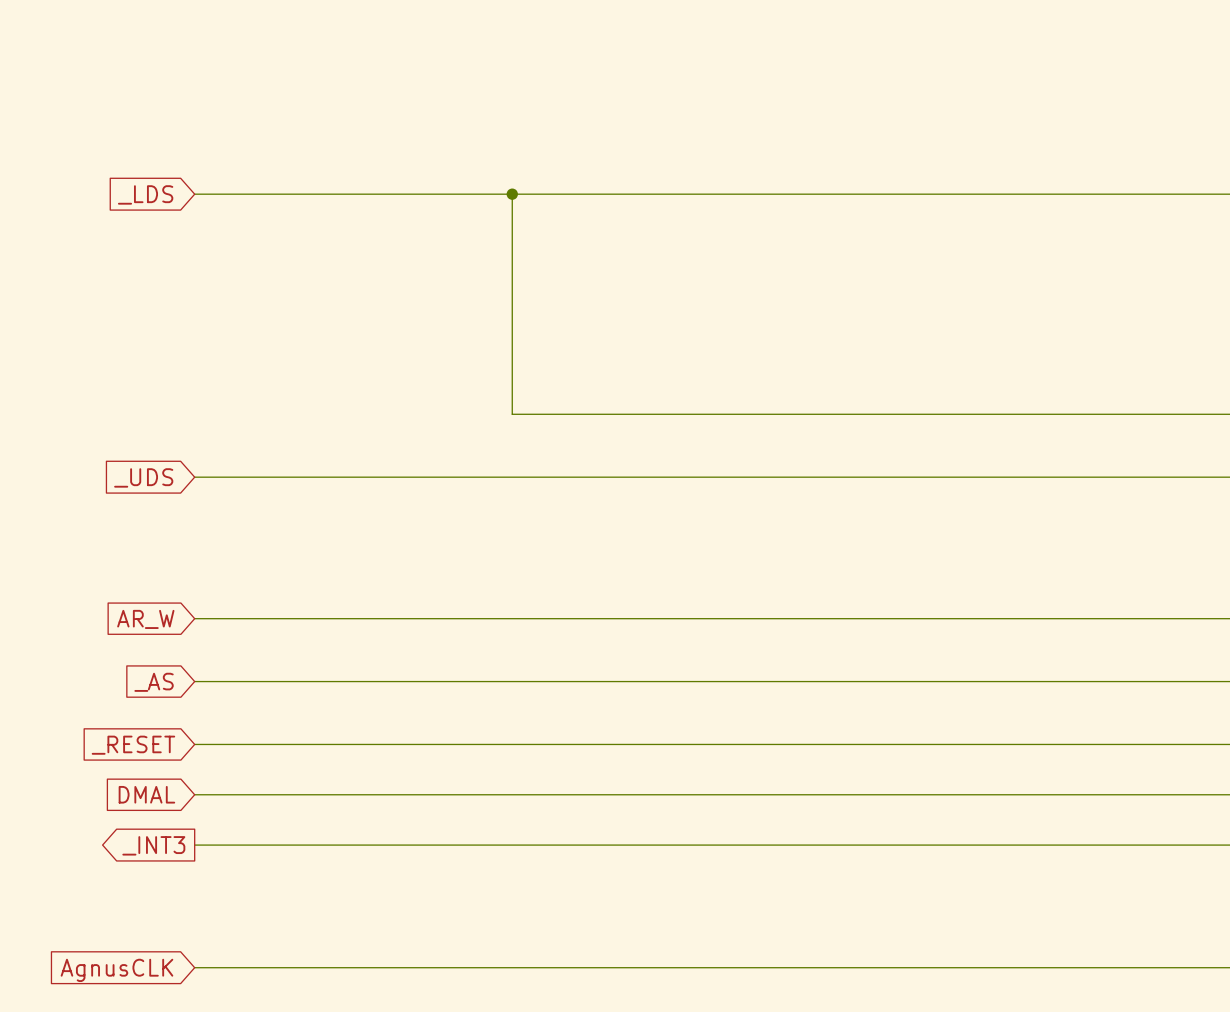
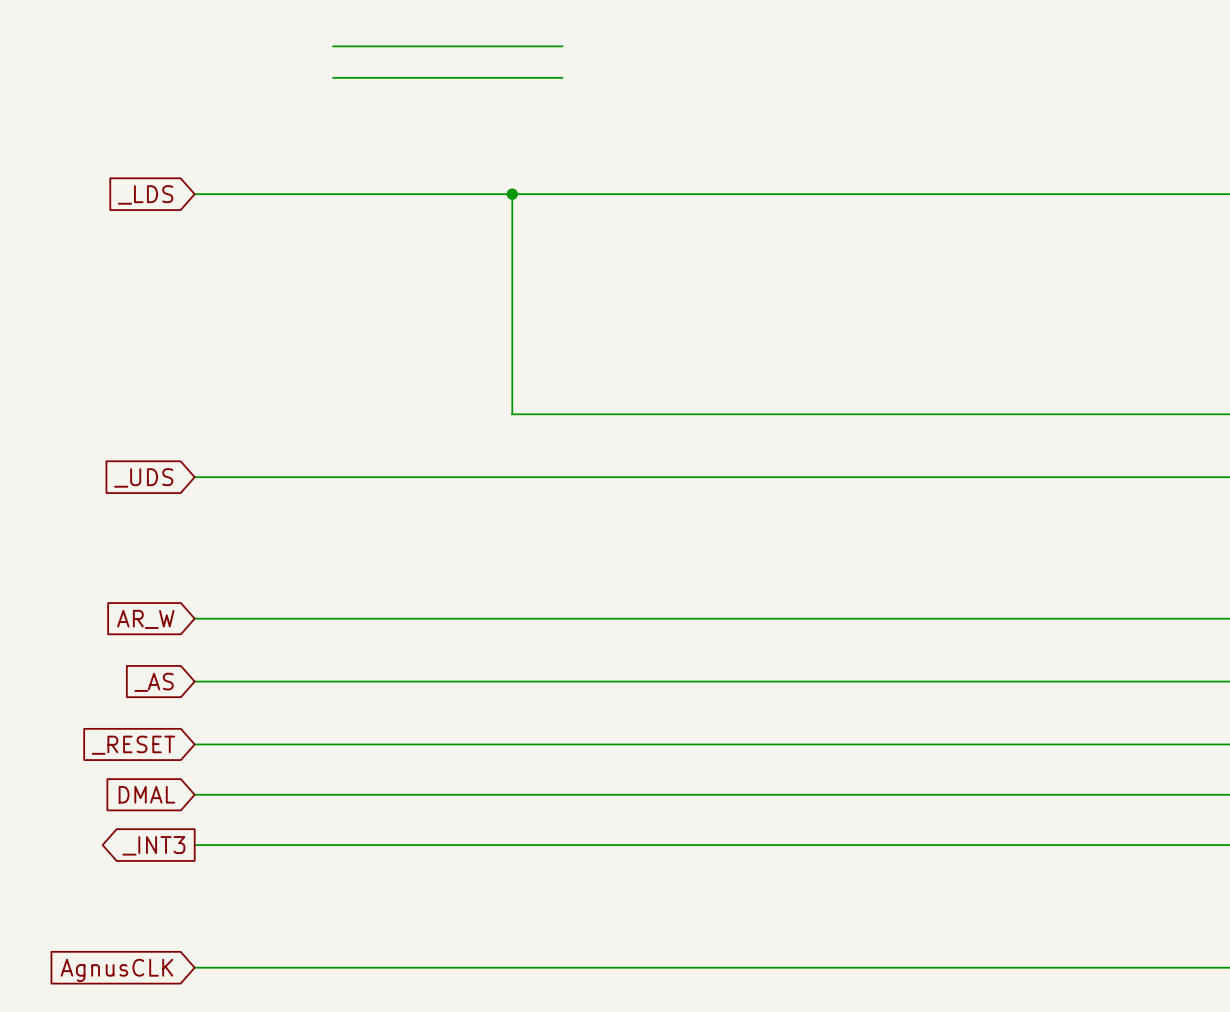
wire: none -> (333, 46) (562, 46)
wire: none -> (333, 77) (562, 77)

